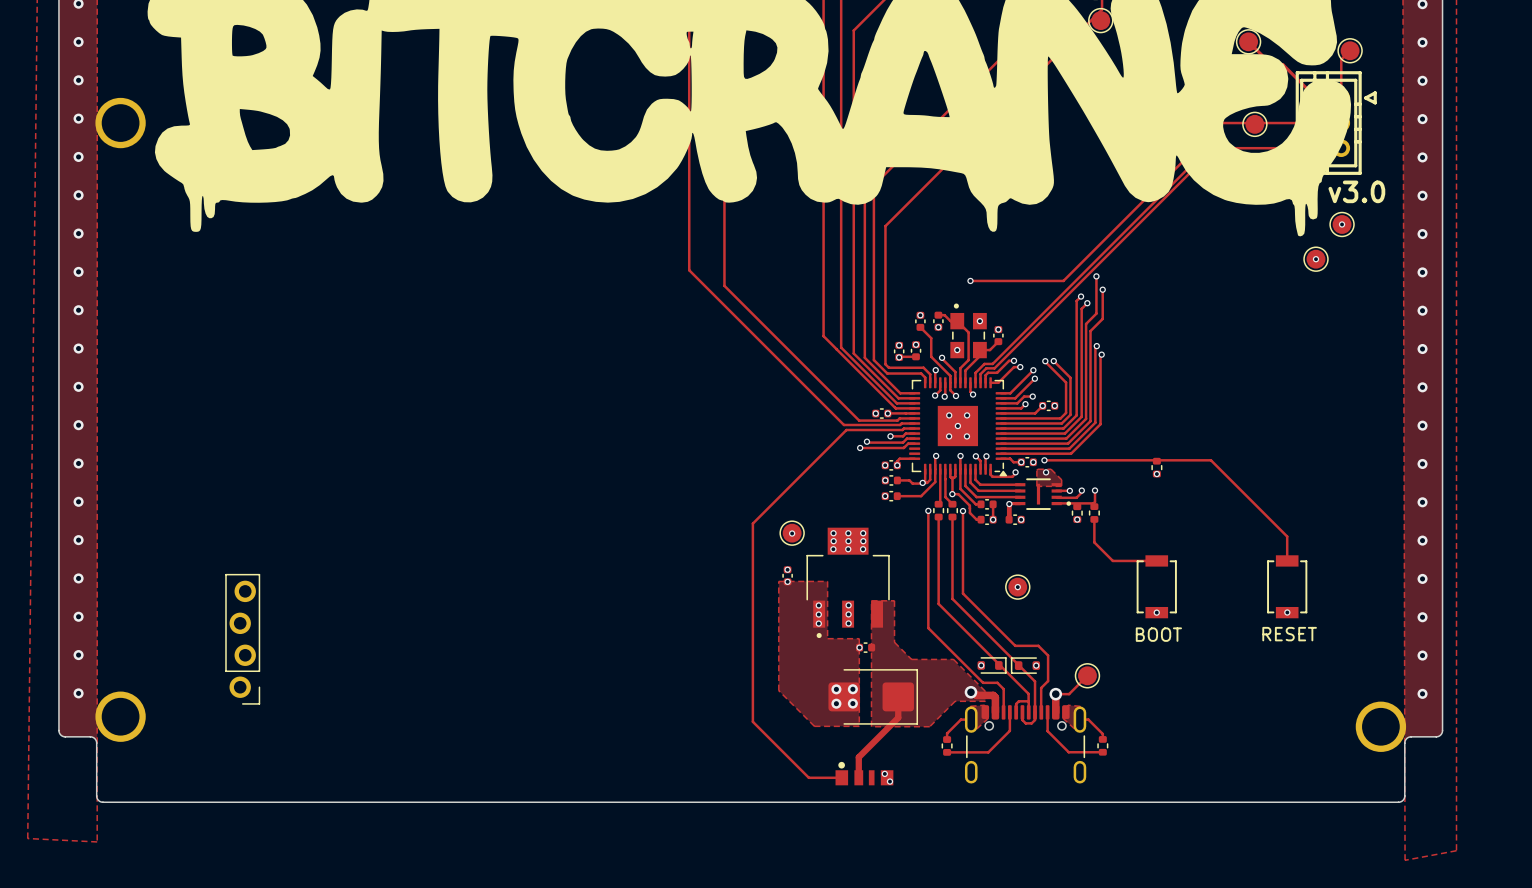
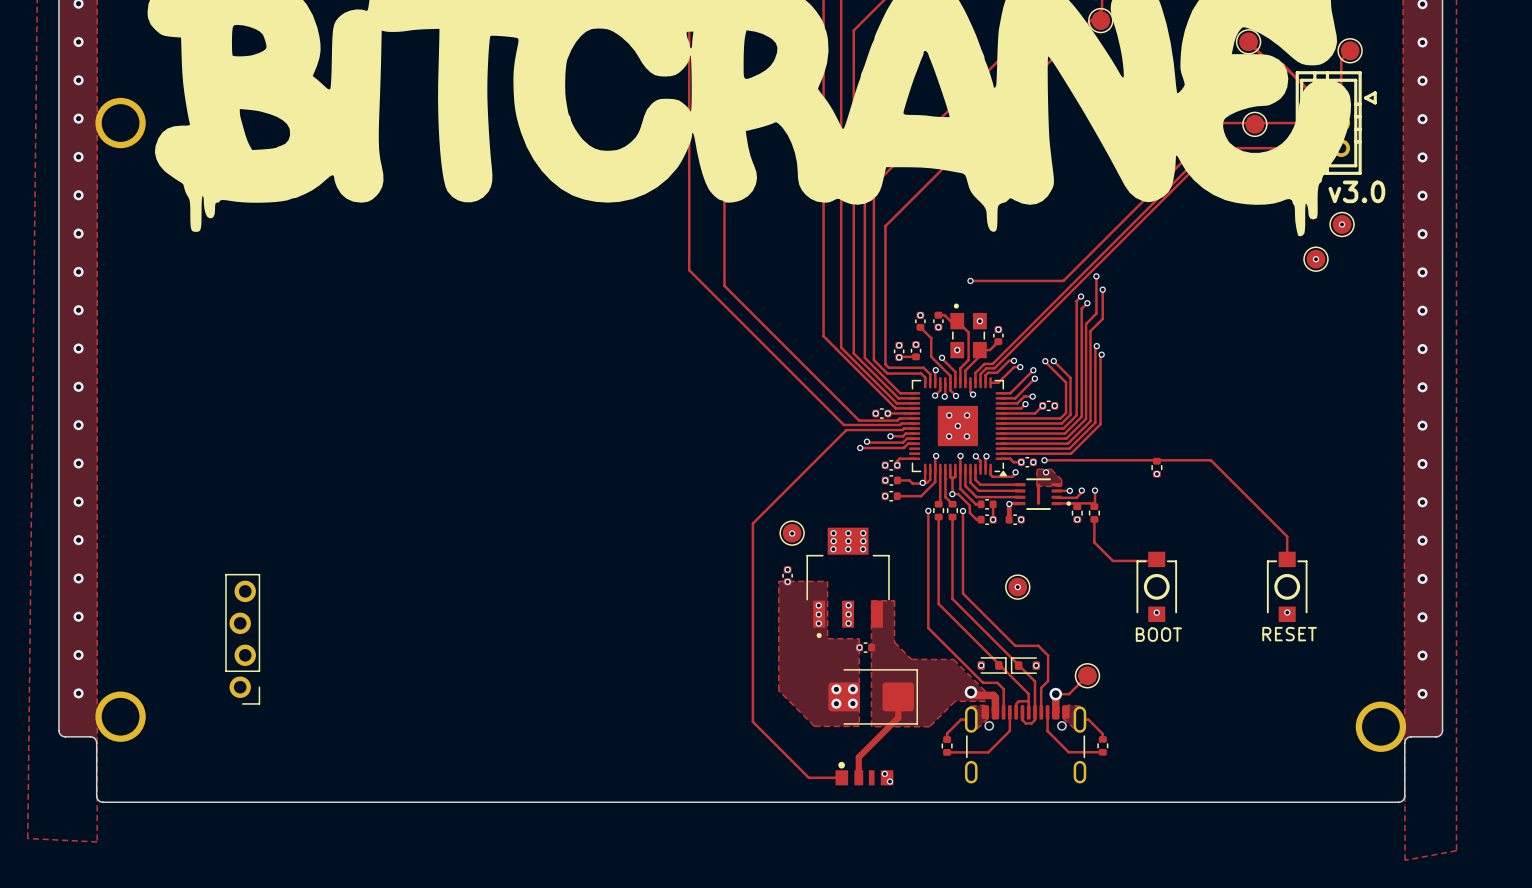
part footprint: [1136, 555, 1177, 619] -> [1136, 551, 1178, 623]
part footprint: [1267, 555, 1308, 619] -> [1266, 551, 1308, 623]

